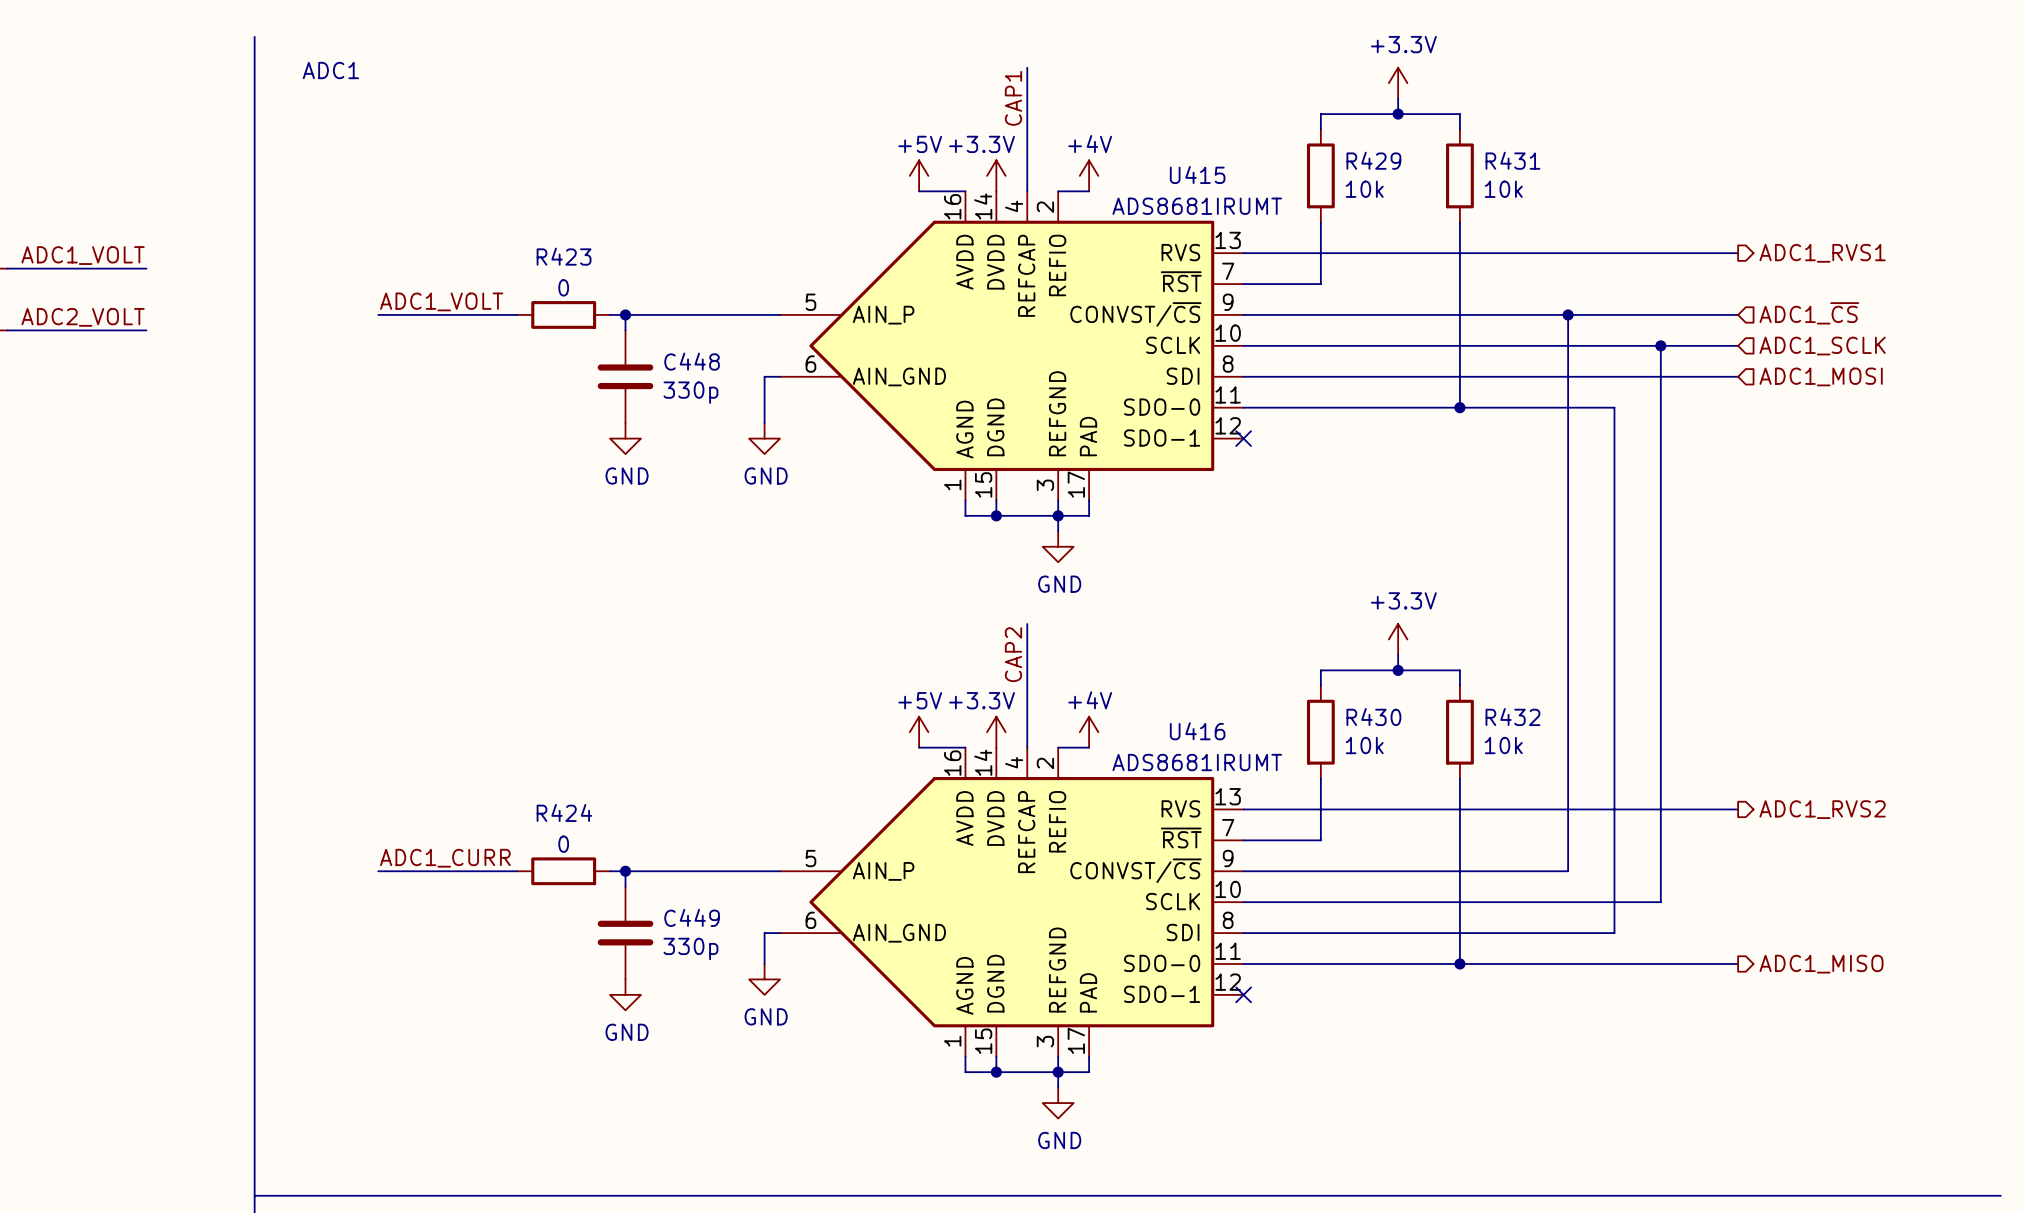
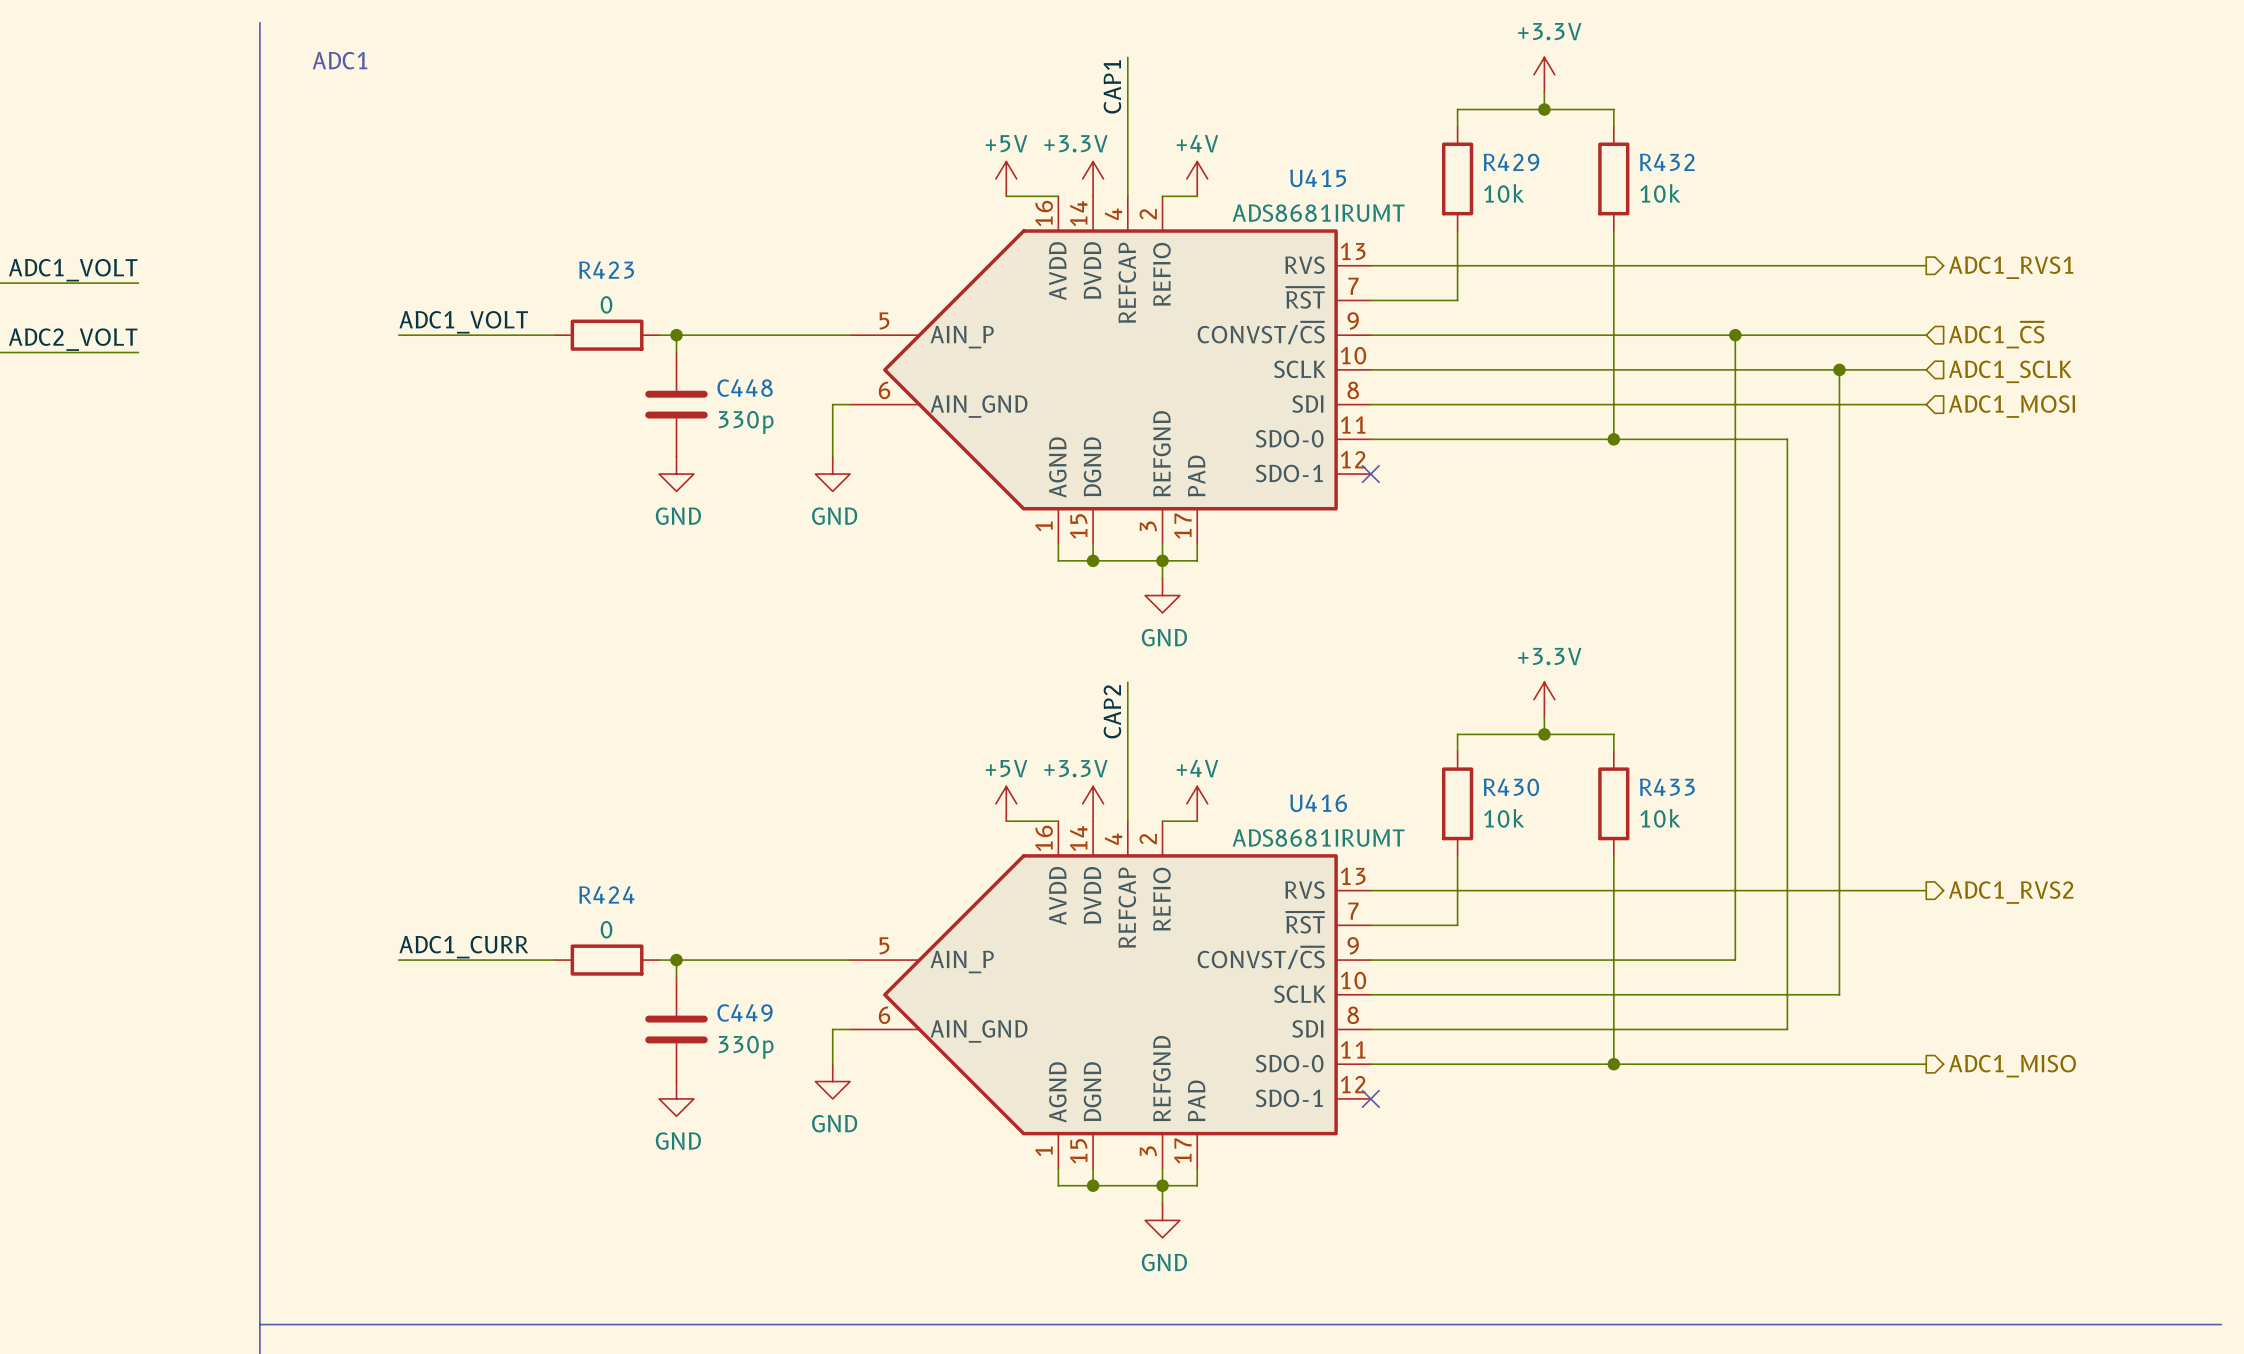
R431 name: R431 (1512, 160) -> R432 (1667, 162)
R432 name: R432 (1512, 717) -> R433 (1667, 787)

